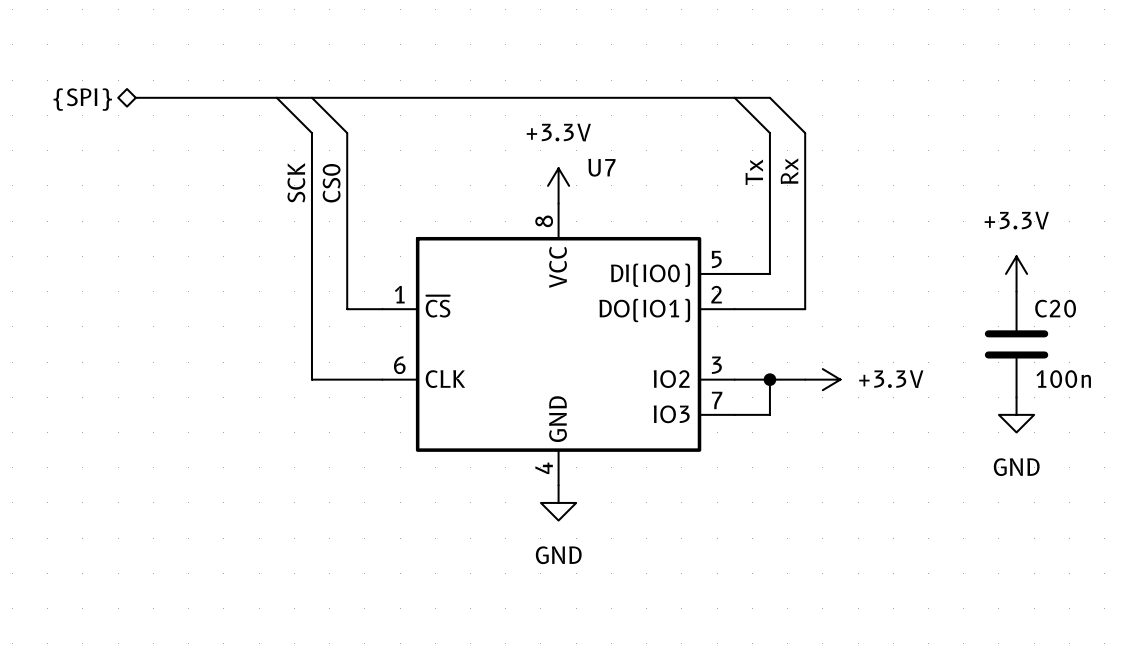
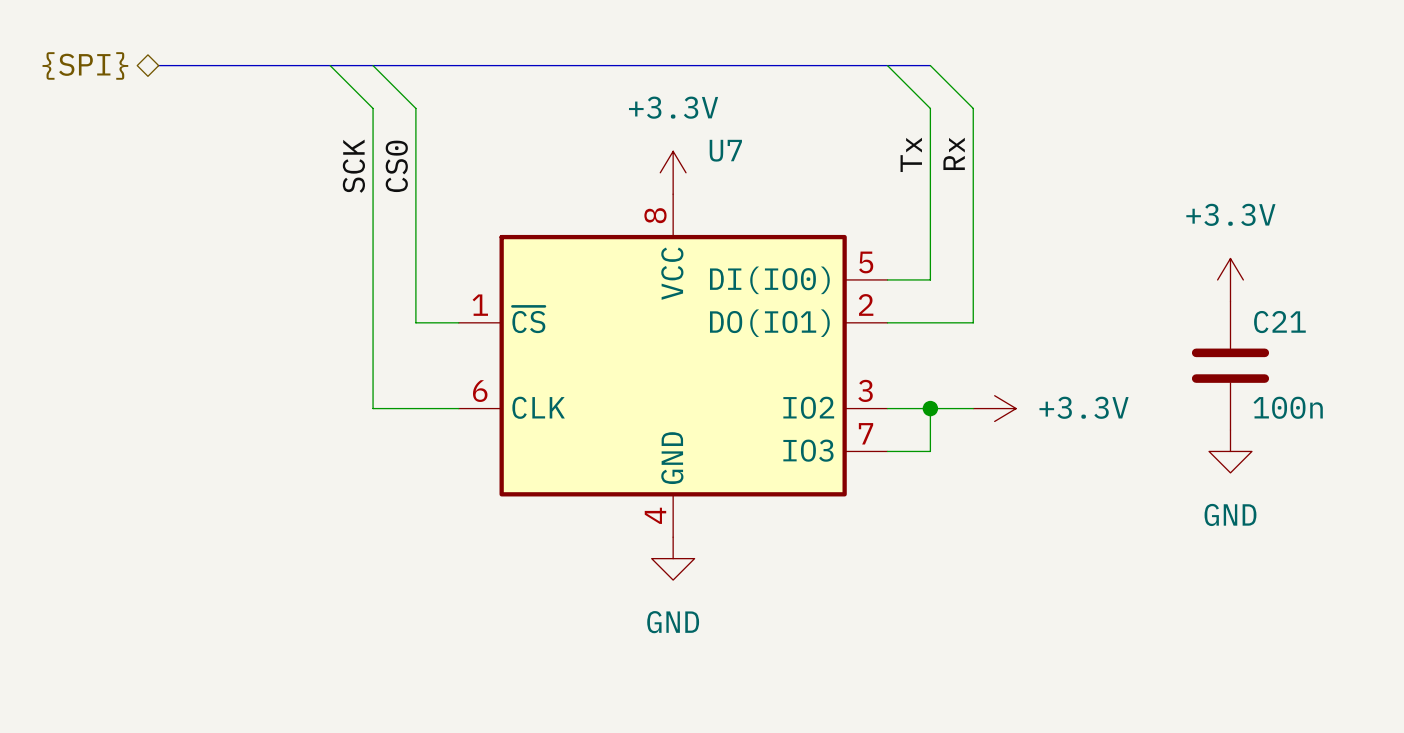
C20 name: C20 (1055, 308) -> C21 (1279, 322)

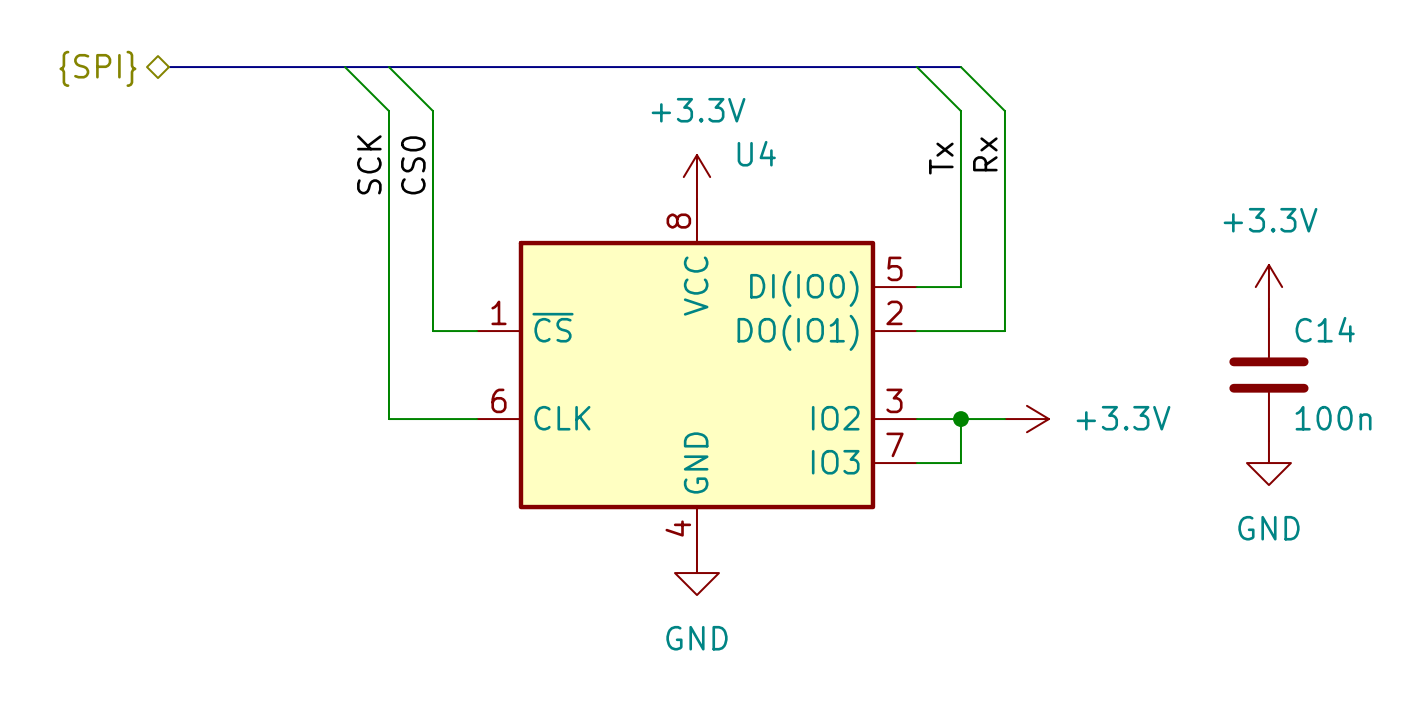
U7 name: U7 (725, 150) -> U4 (756, 153)
C21 name: C21 (1279, 322) -> C14 (1325, 329)

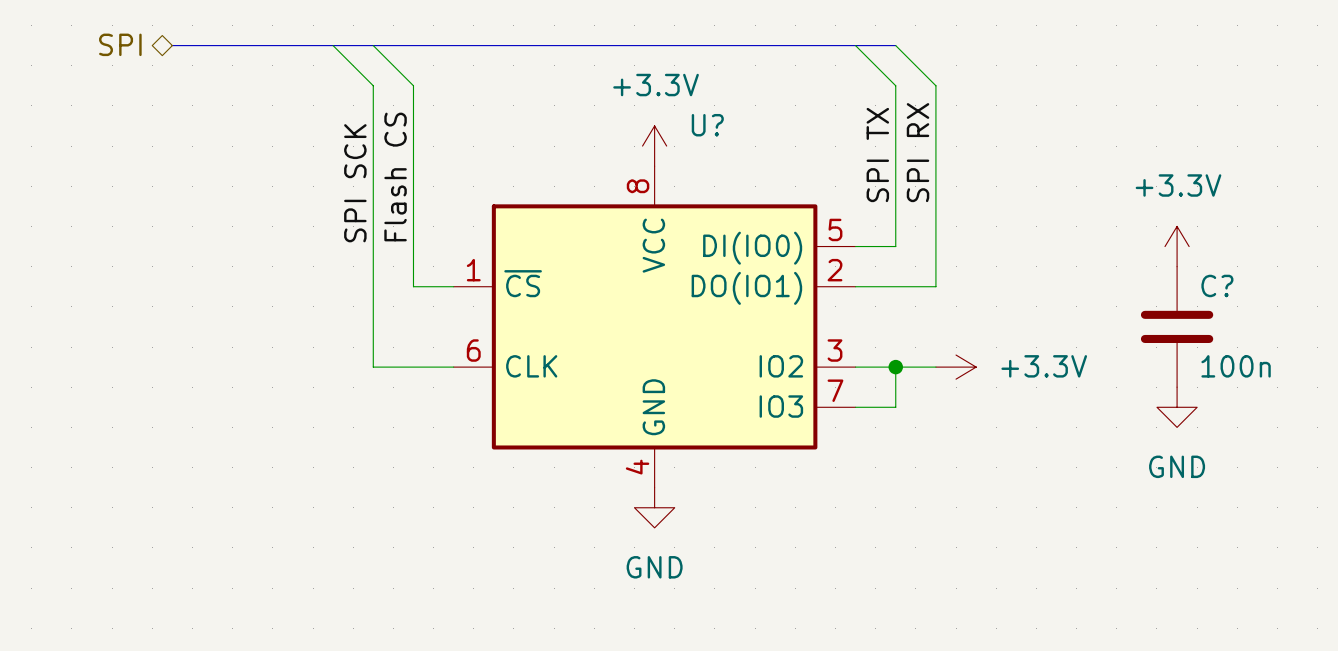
hierarchical label: {SPI} (97, 68) -> SPI (120, 44)
U4 name: U4 (756, 153) -> U? (707, 125)
label: Rx (985, 154) -> none
label: Tx (941, 158) -> none
label: SCK (369, 164) -> none
label: CS0 (413, 165) -> none
label: none -> SPI RX (918, 152)
label: none -> SPI TX (877, 155)
label: none -> Flash CS (395, 177)
label: none -> SPI SCK (355, 183)
C14 name: C14 (1325, 329) -> C? (1217, 285)

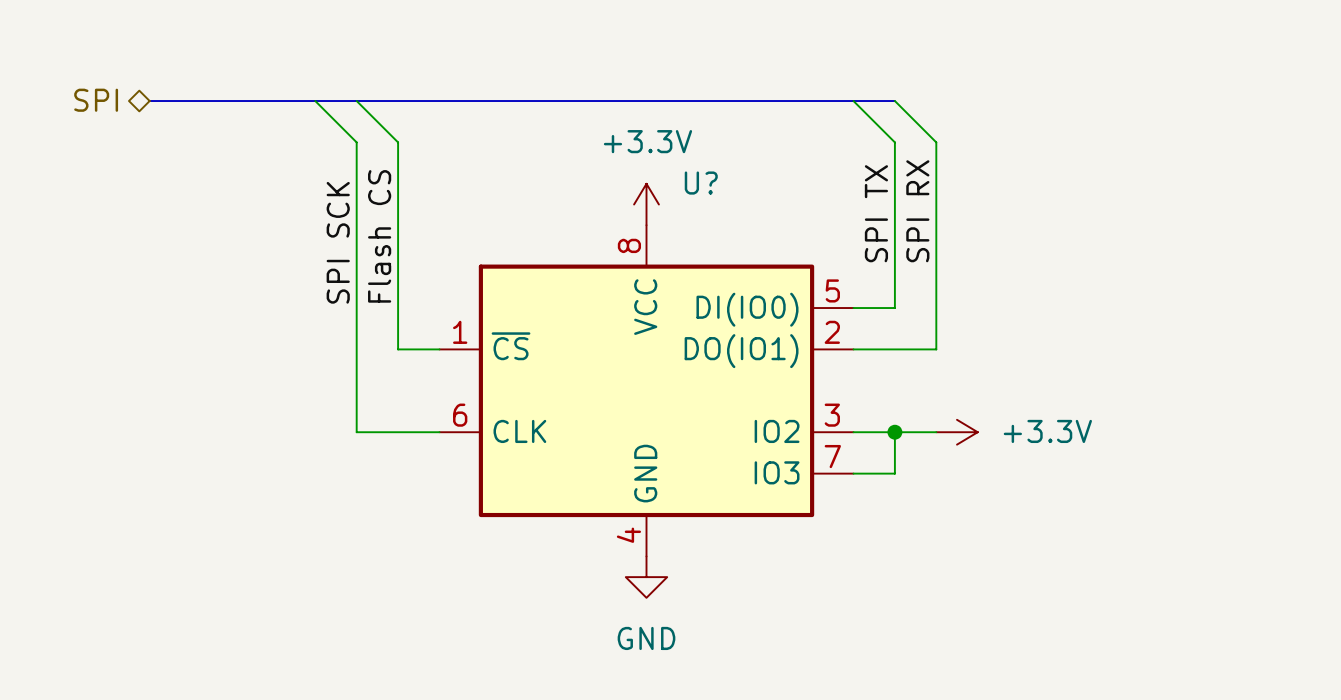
power symbol: +3.3V (1177, 246) -> none
C?: 100n (1177, 326) -> none
power symbol: GND (1177, 407) -> none

